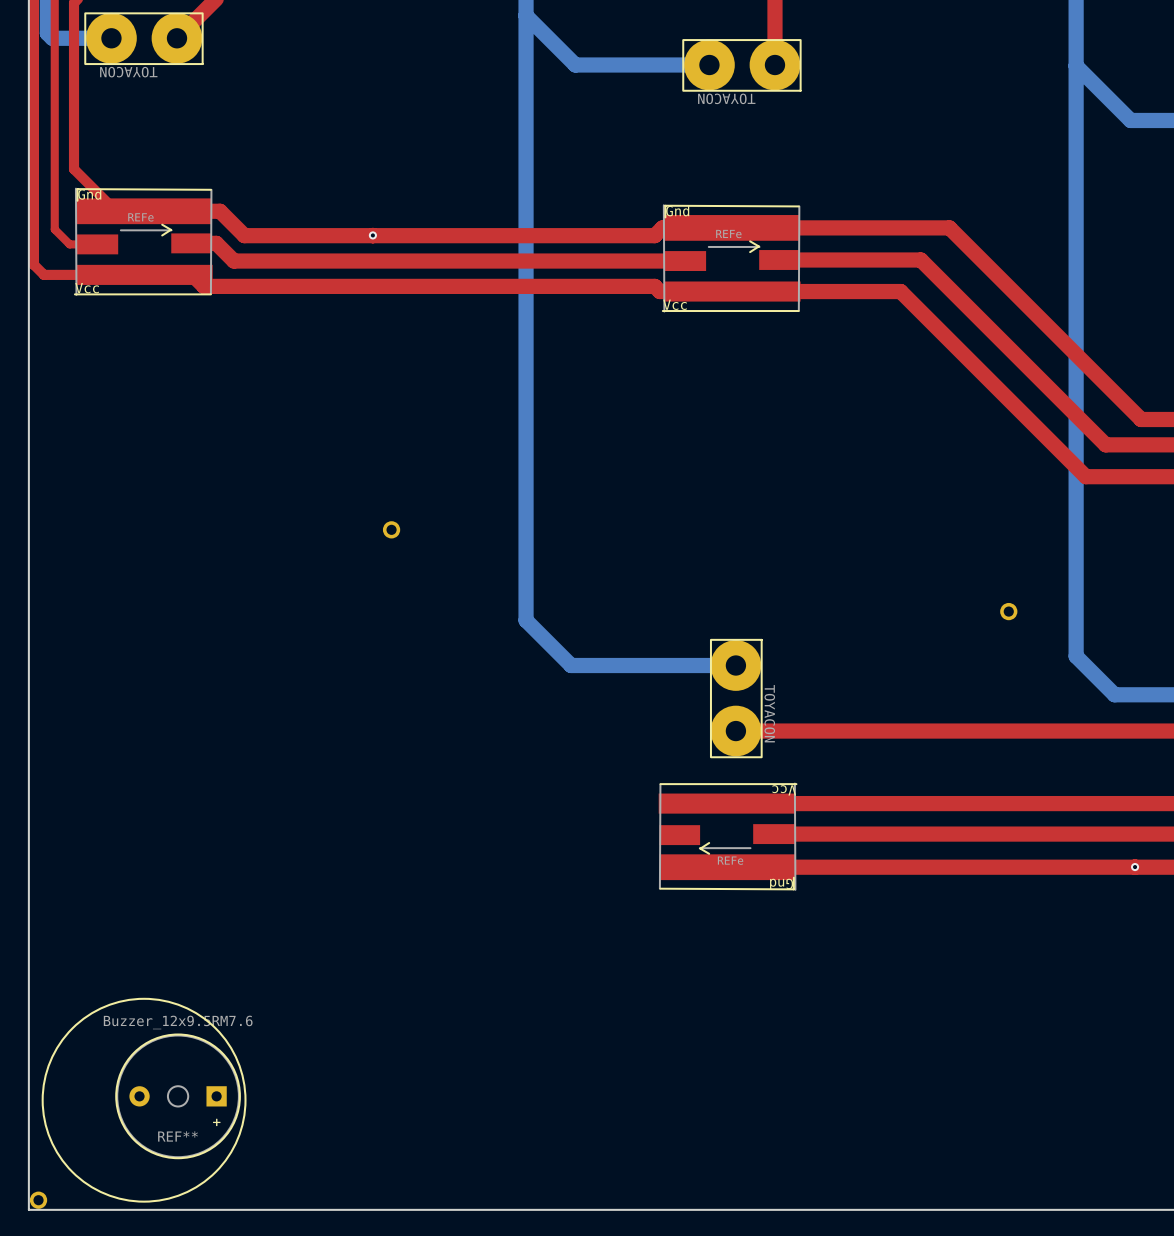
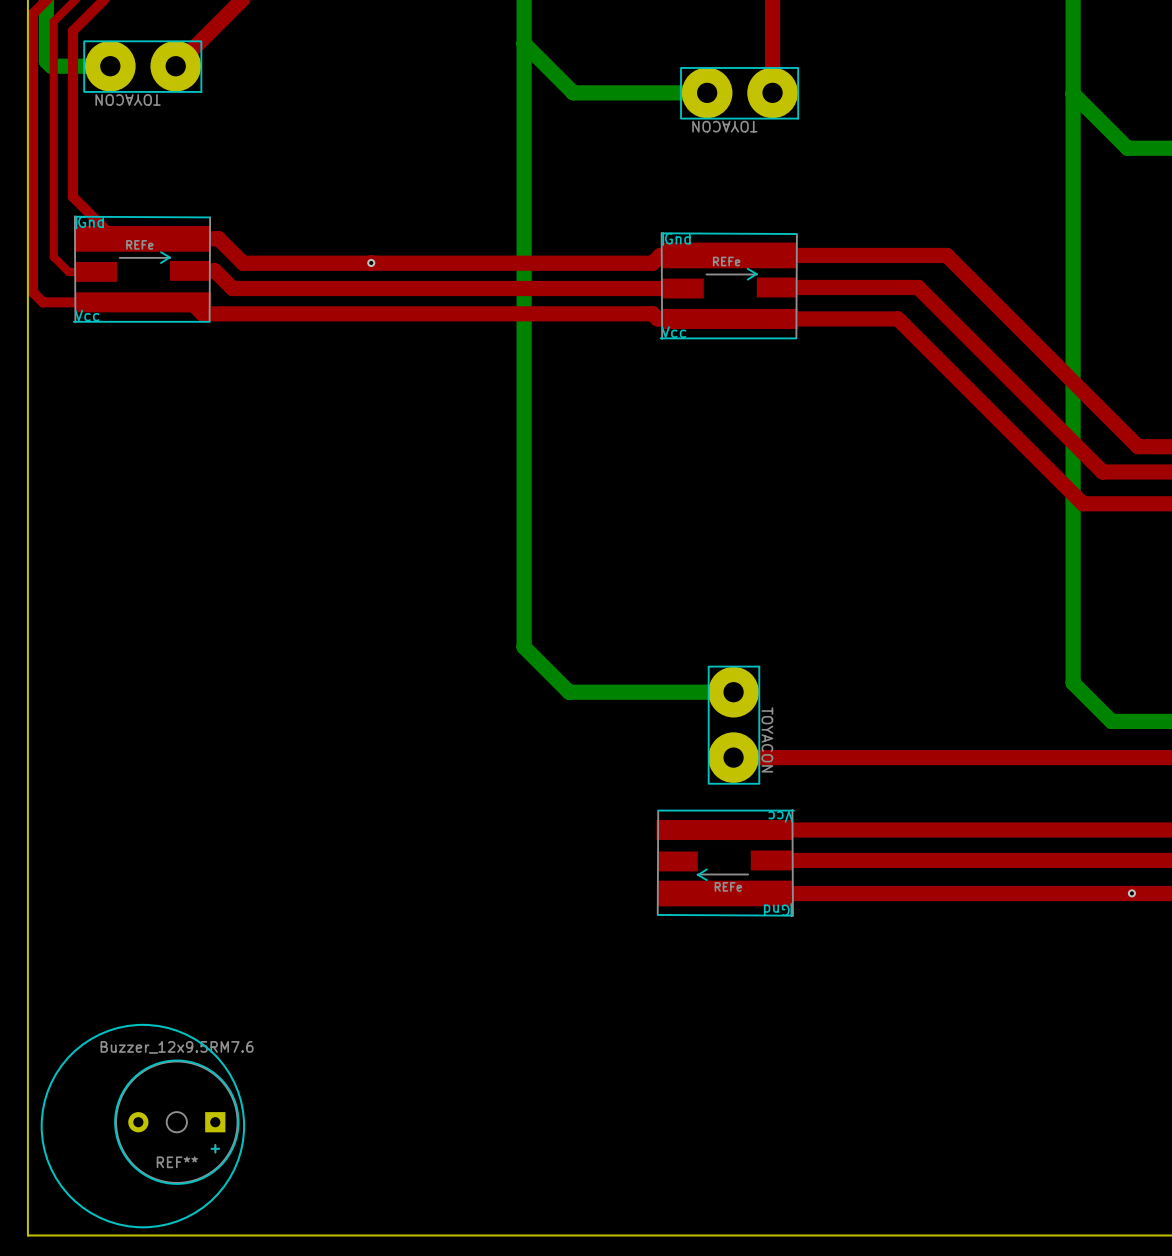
part: (391, 529) -> none
part: (1008, 611) -> none
part: (38, 1200) -> none

